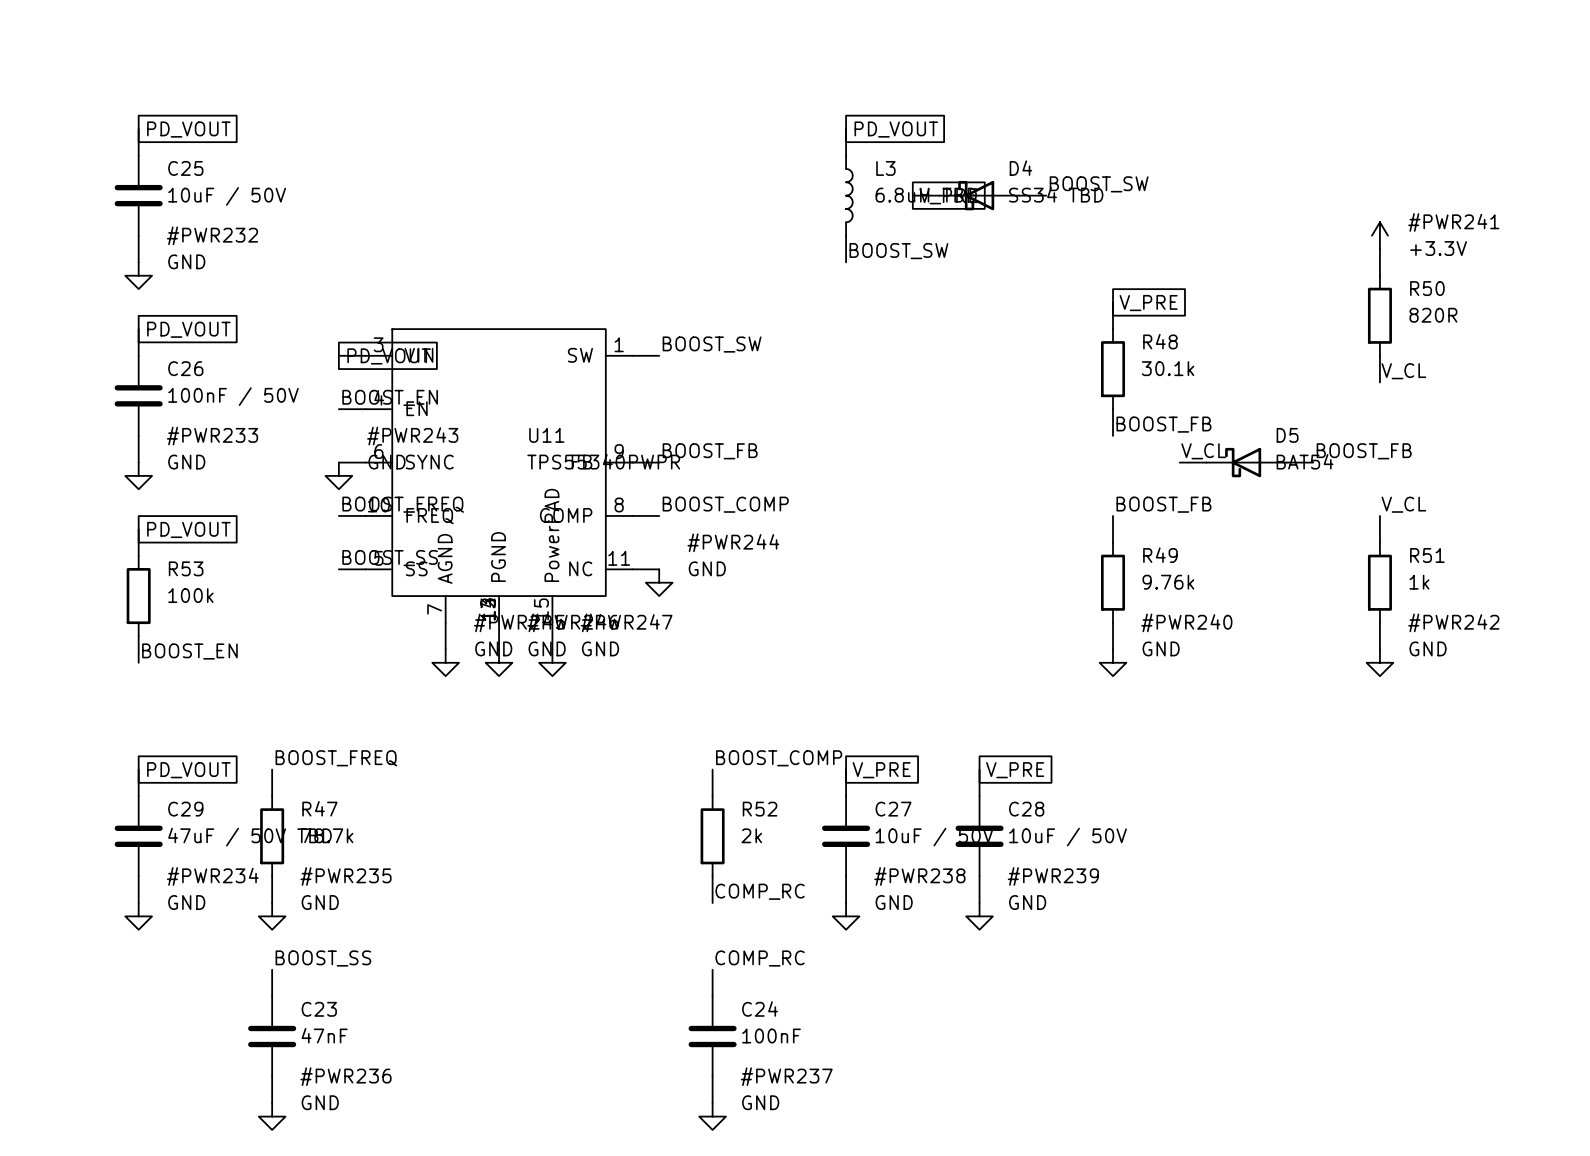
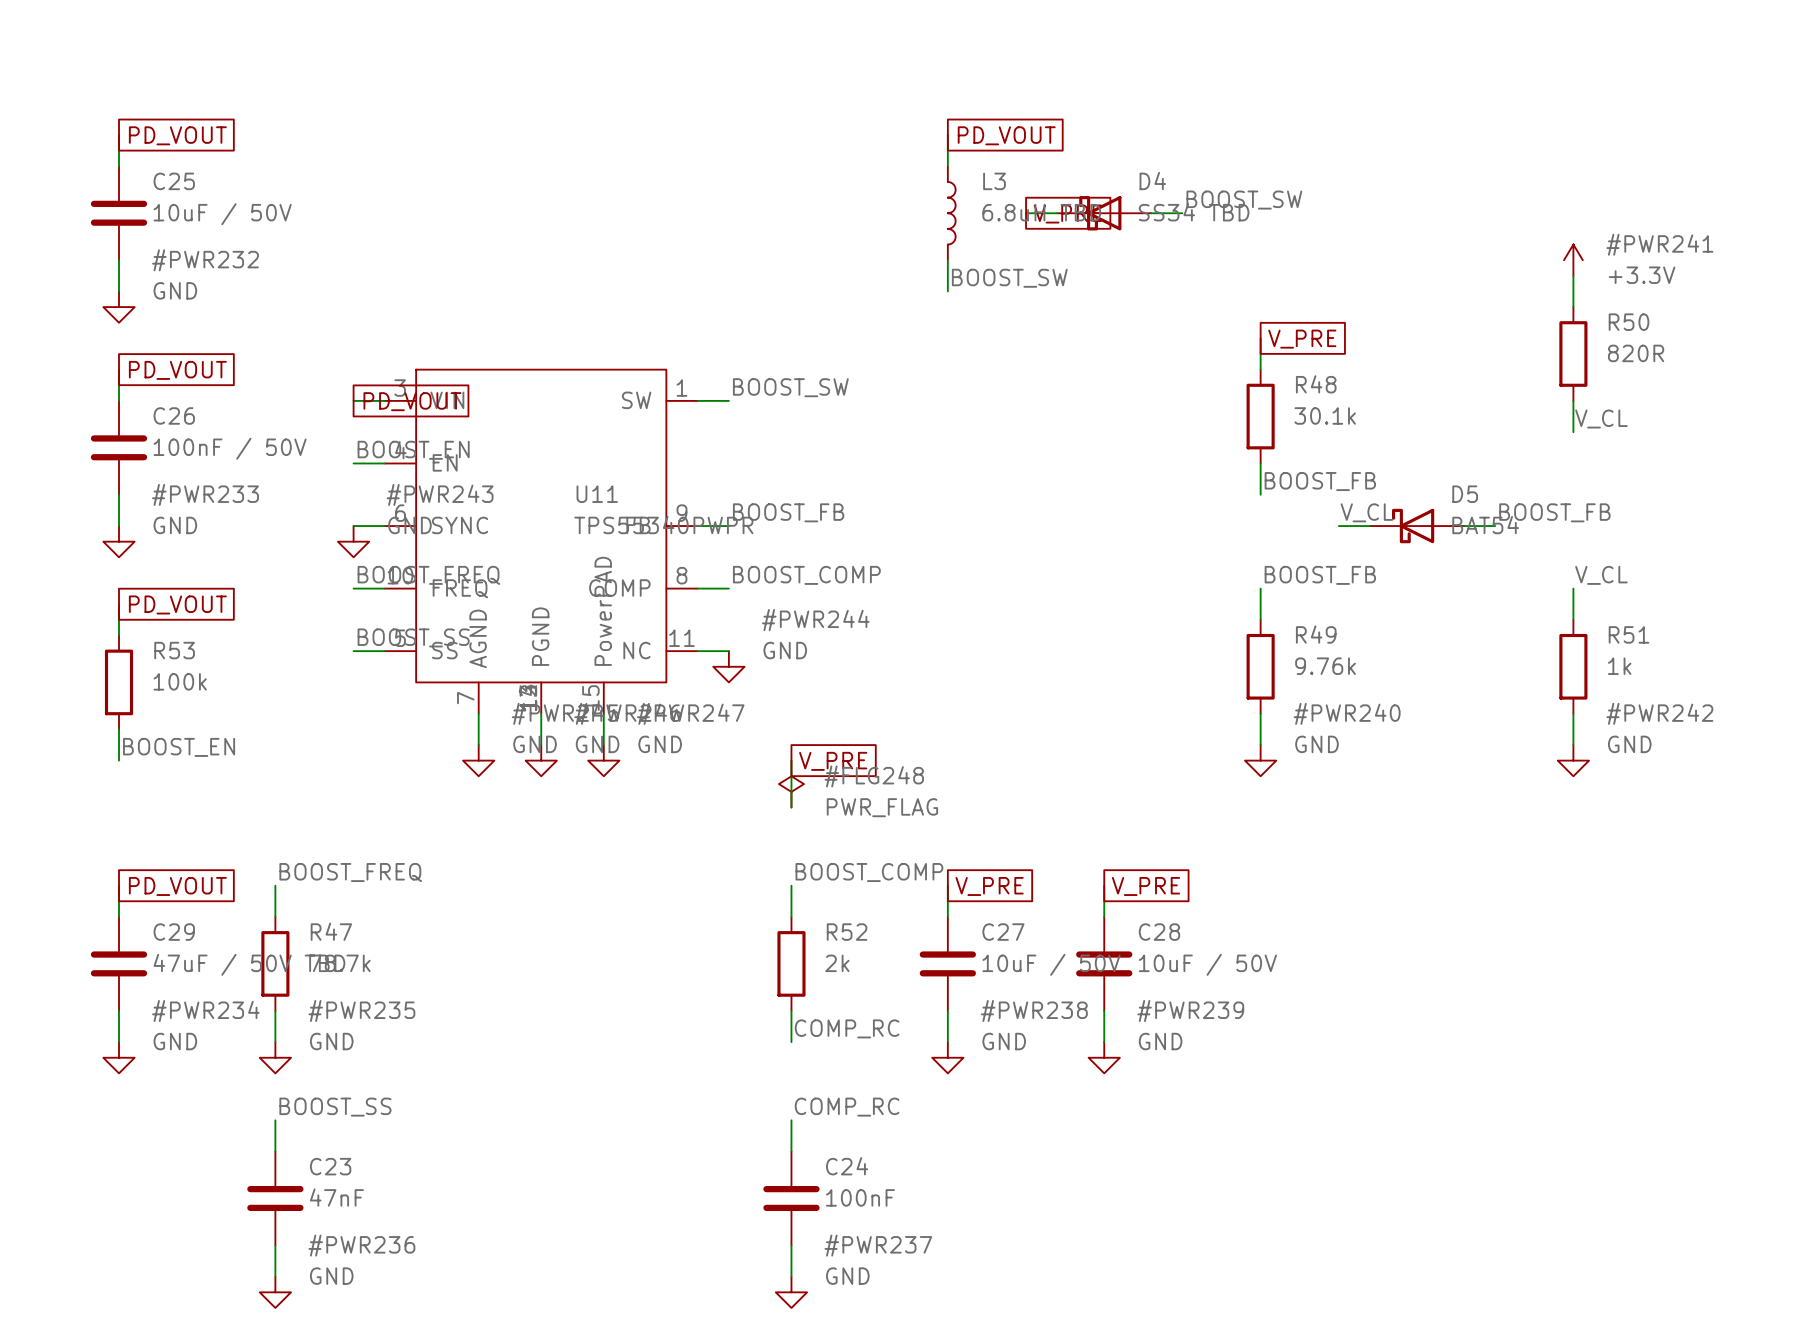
wire: none -> (791, 760) (791, 807)
global label: none -> V_PRE (833, 761)
#FLG248: none -> PWR_FLAG (791, 791)

